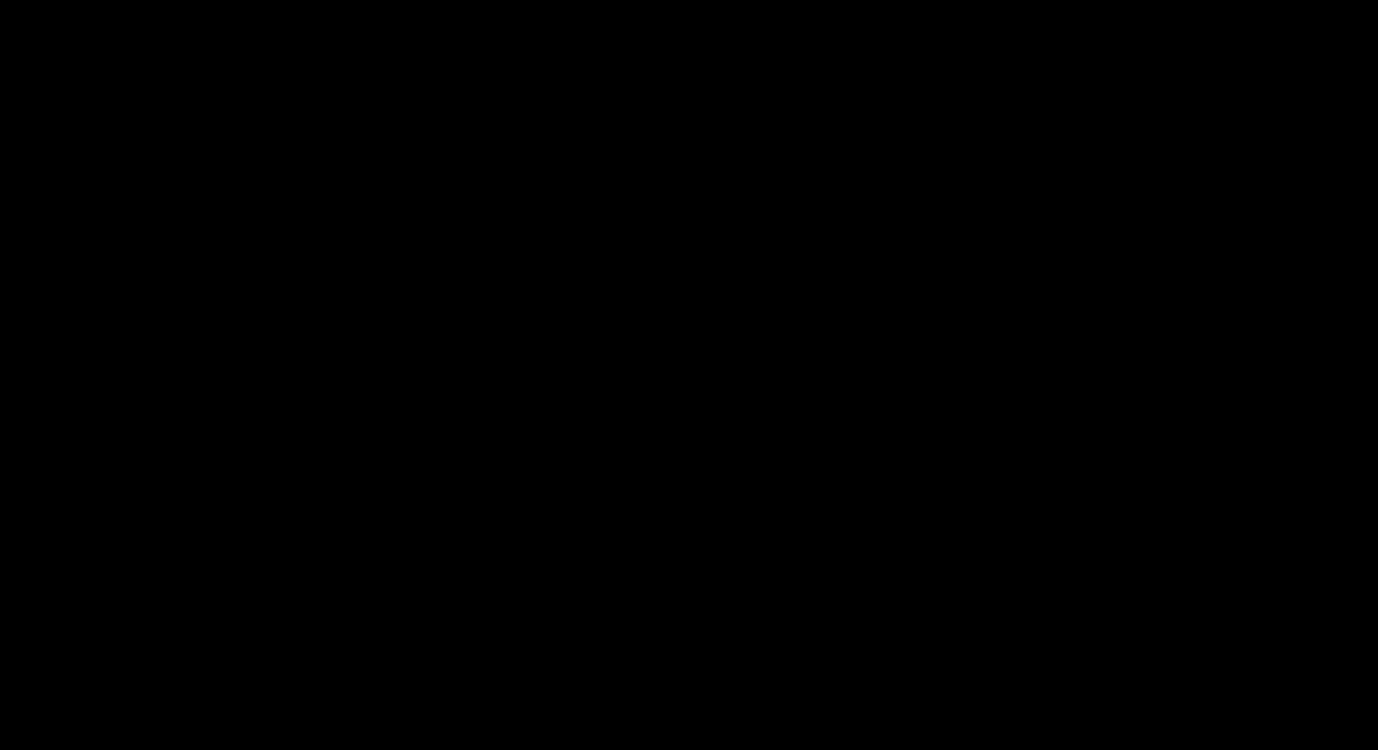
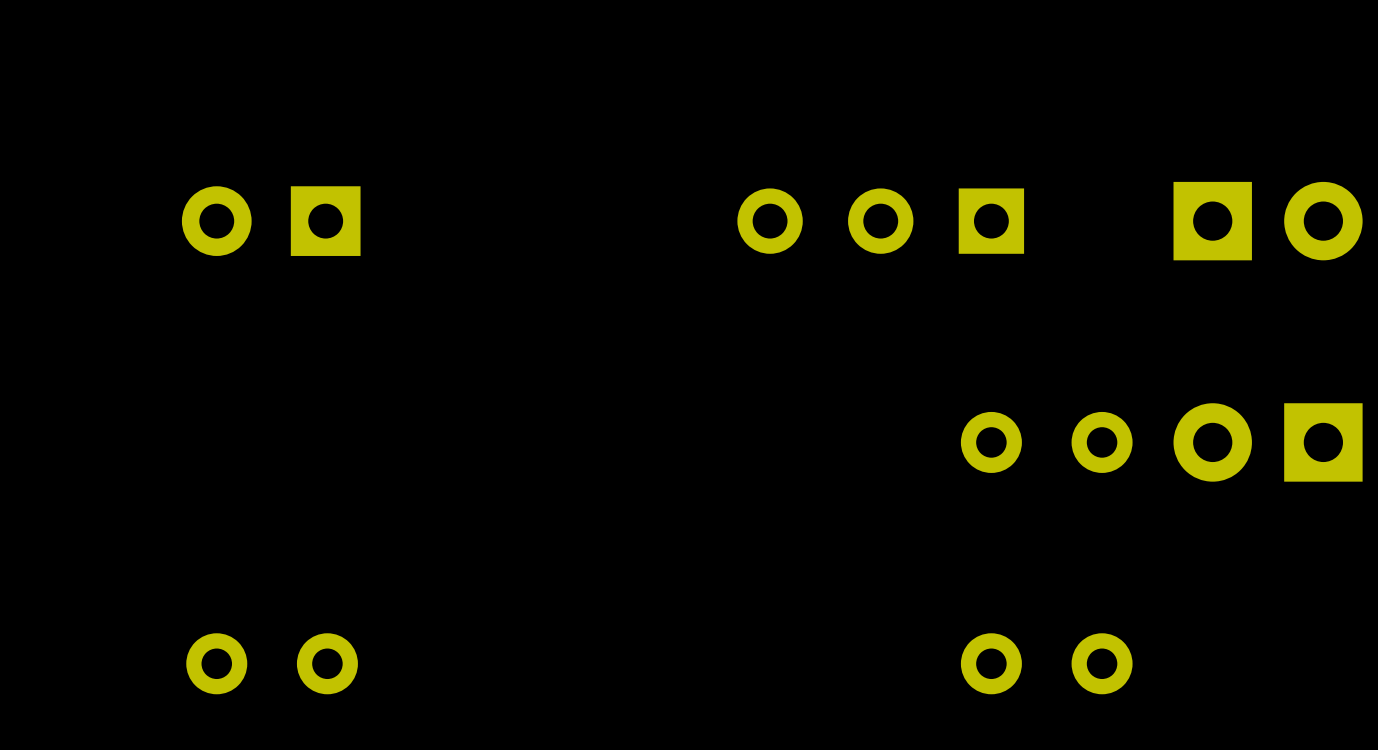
part: none -> (271, 221)
part: none -> (880, 221)
part: none -> (1268, 221)
part: none -> (1046, 442)
part: none -> (1268, 442)
part: none -> (272, 663)
part: none -> (1046, 663)

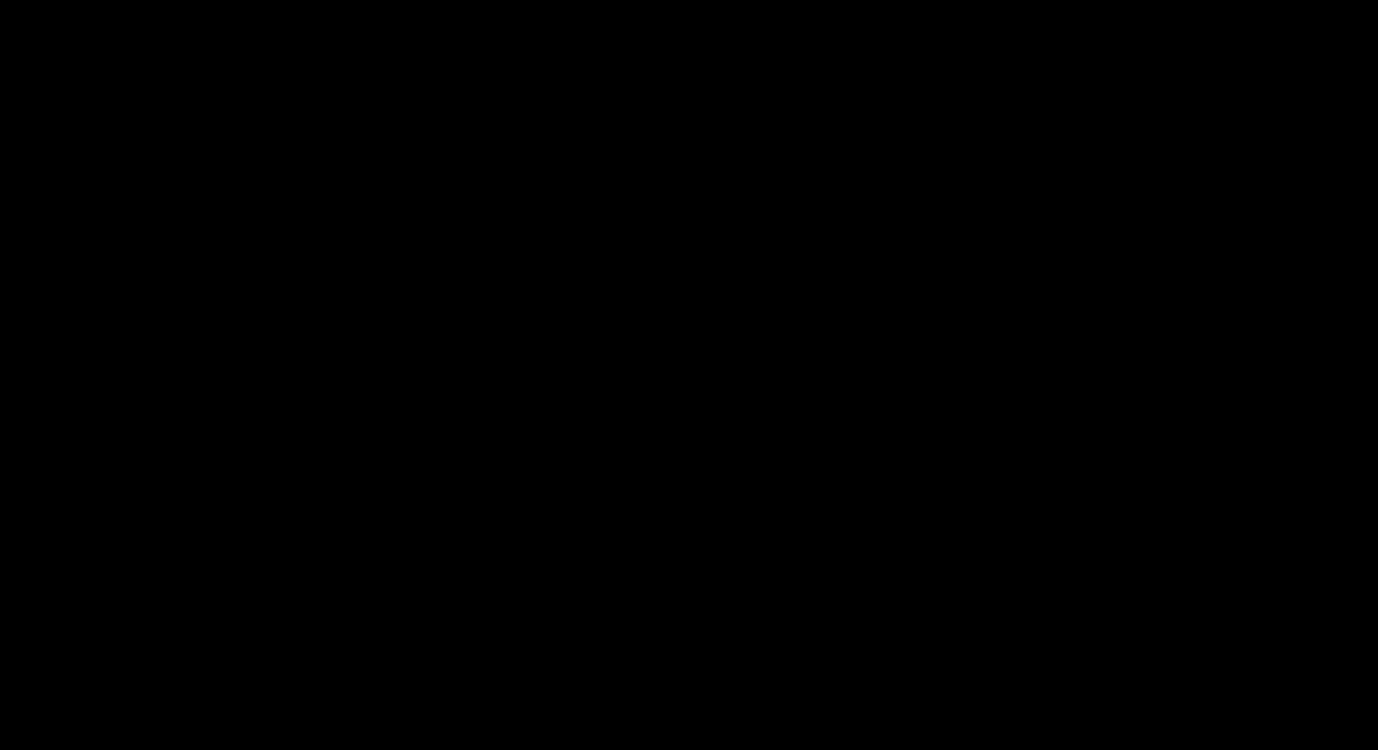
part: (271, 221) -> none
part: (880, 221) -> none
part: (1268, 221) -> none
part: (1046, 442) -> none
part: (1268, 442) -> none
part: (272, 663) -> none
part: (1046, 663) -> none

